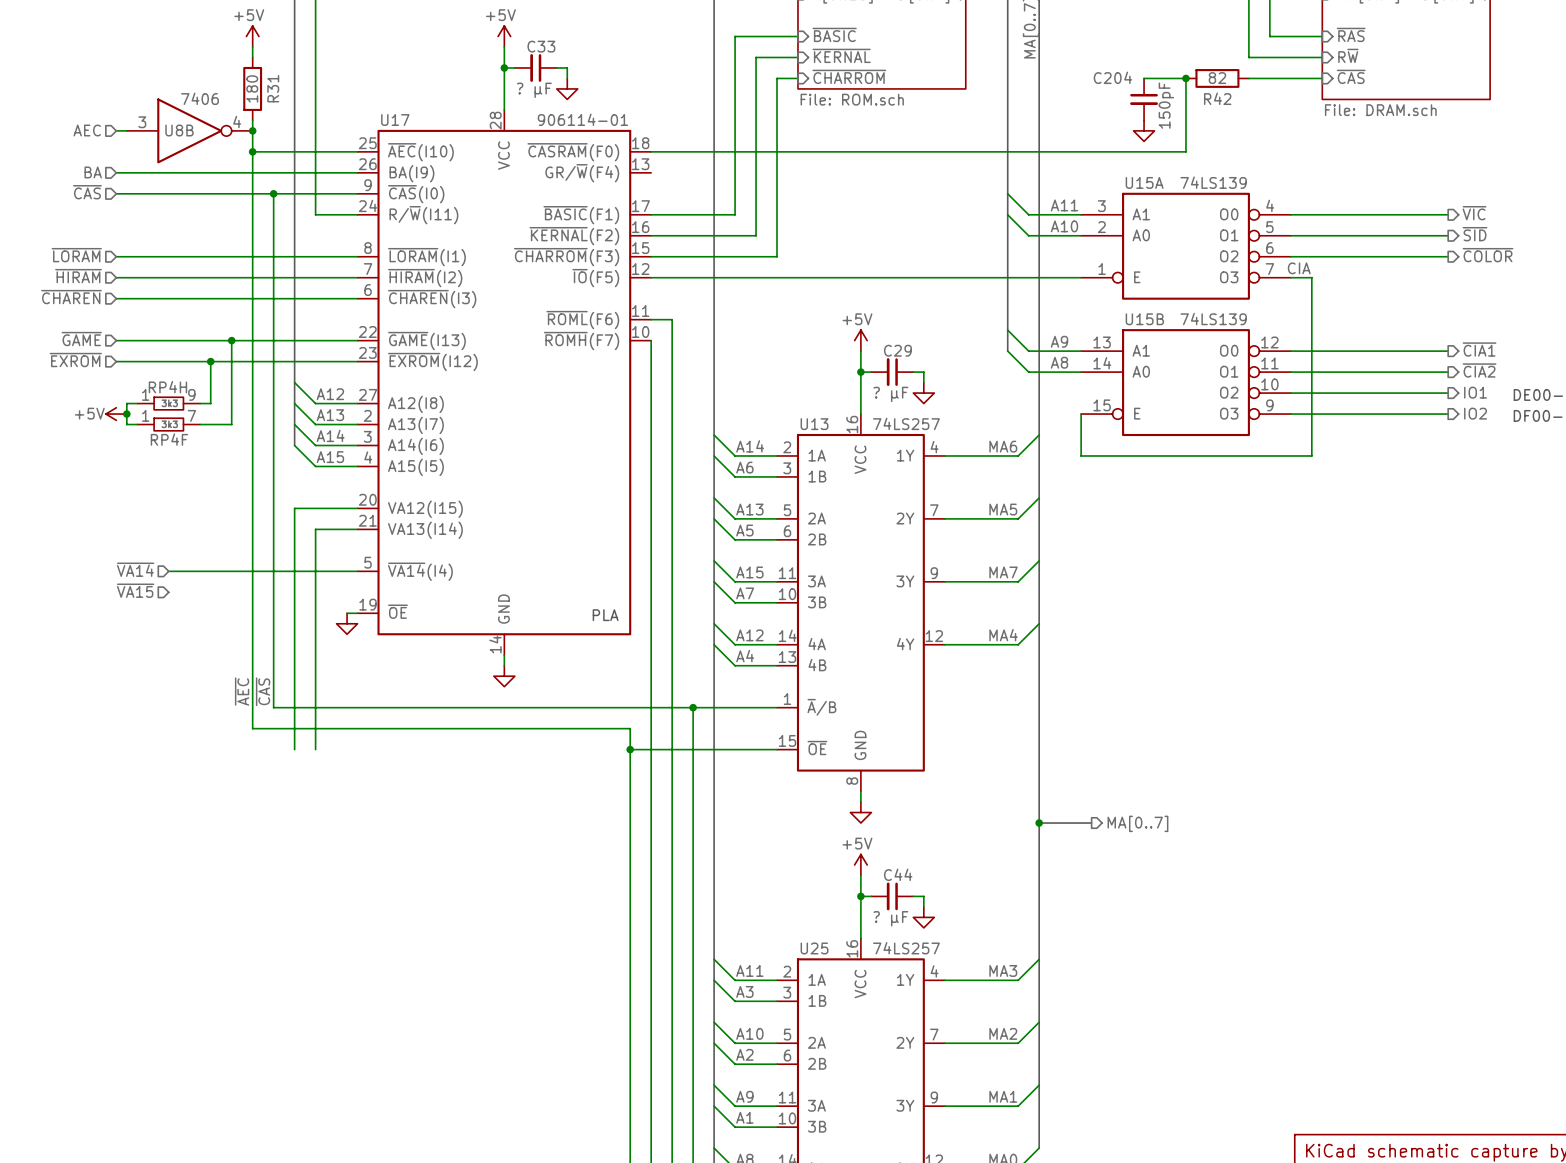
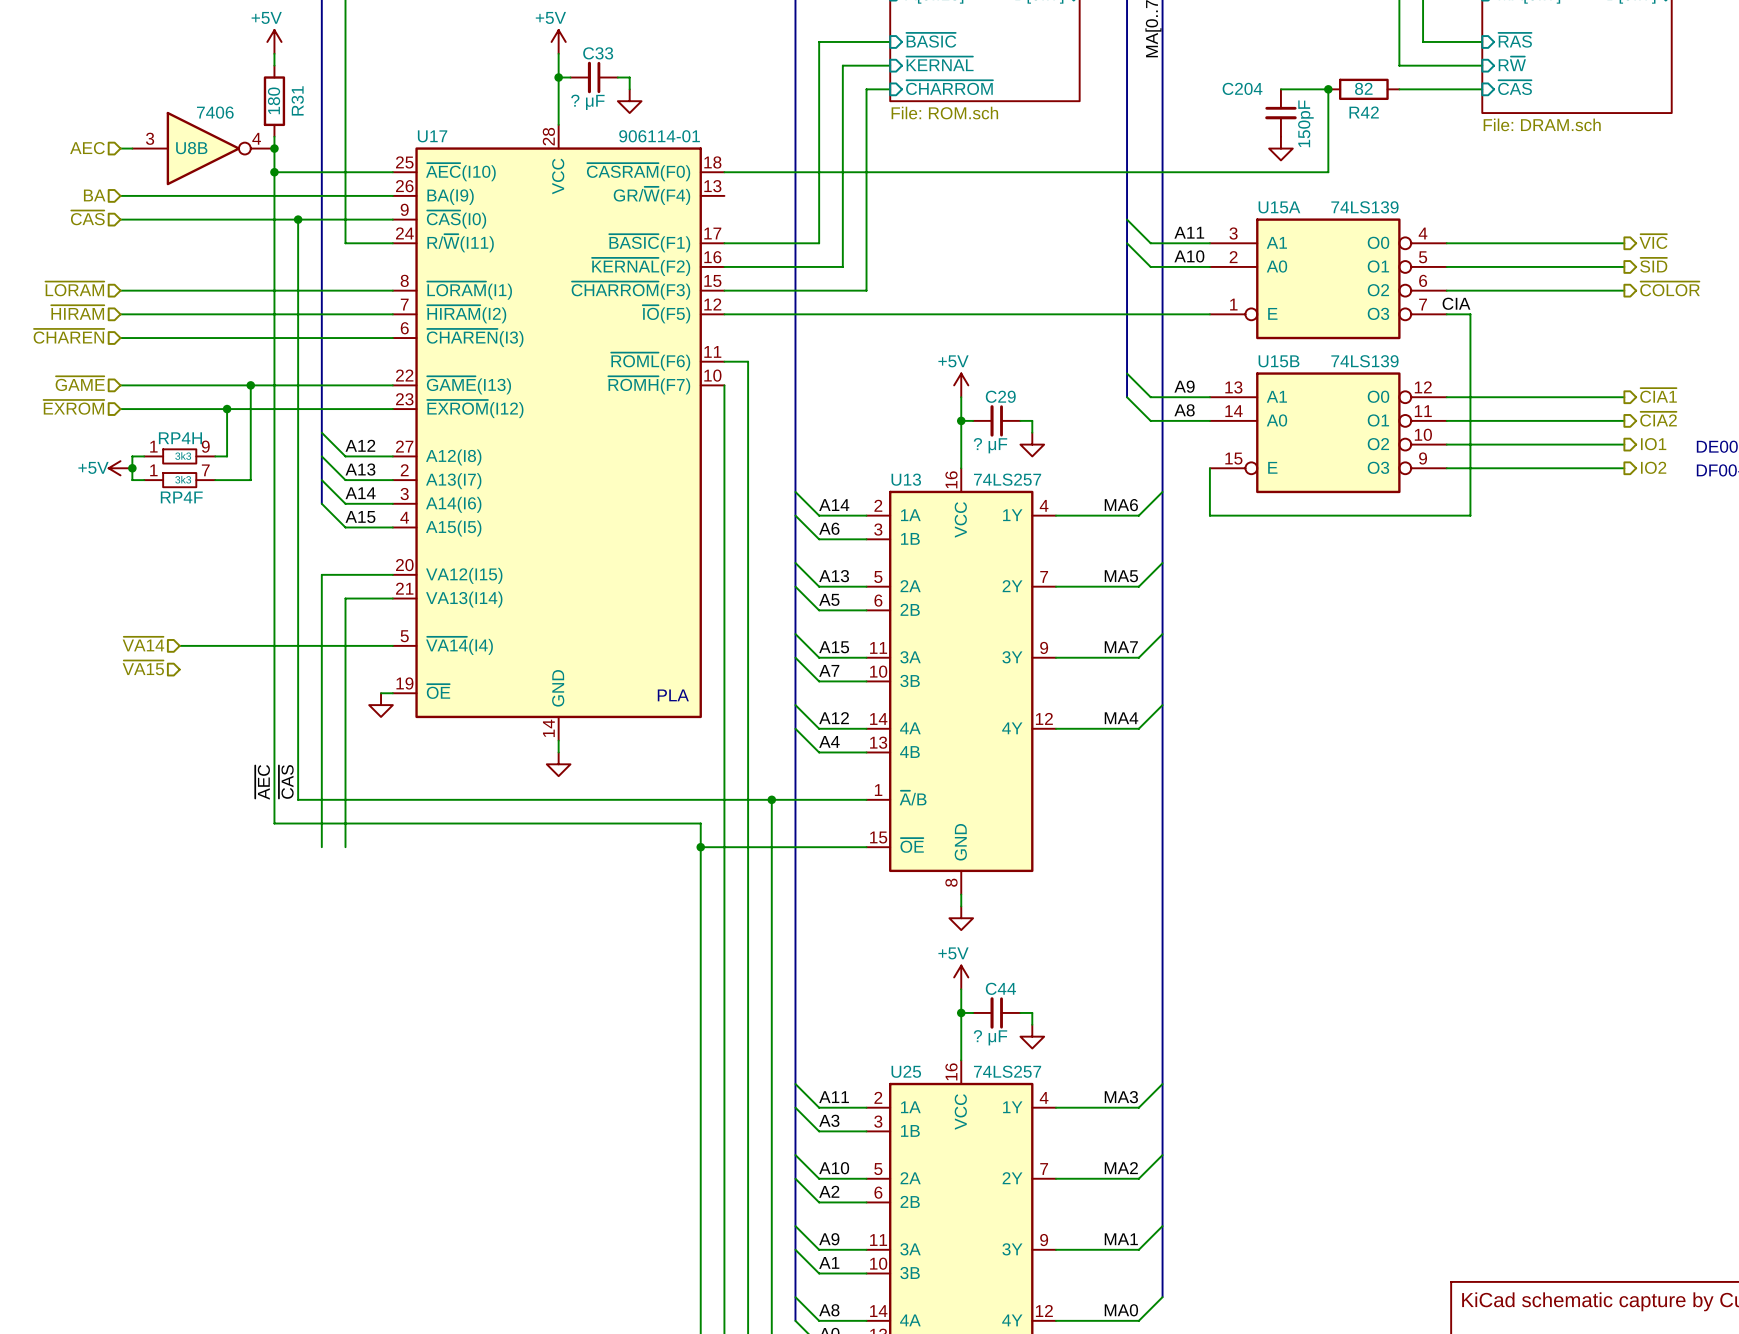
bus: (1039, 823) (1091, 823) -> none
junction: (1039, 823) -> none
hierarchical label: MA[0..7] (1137, 823) -> none

